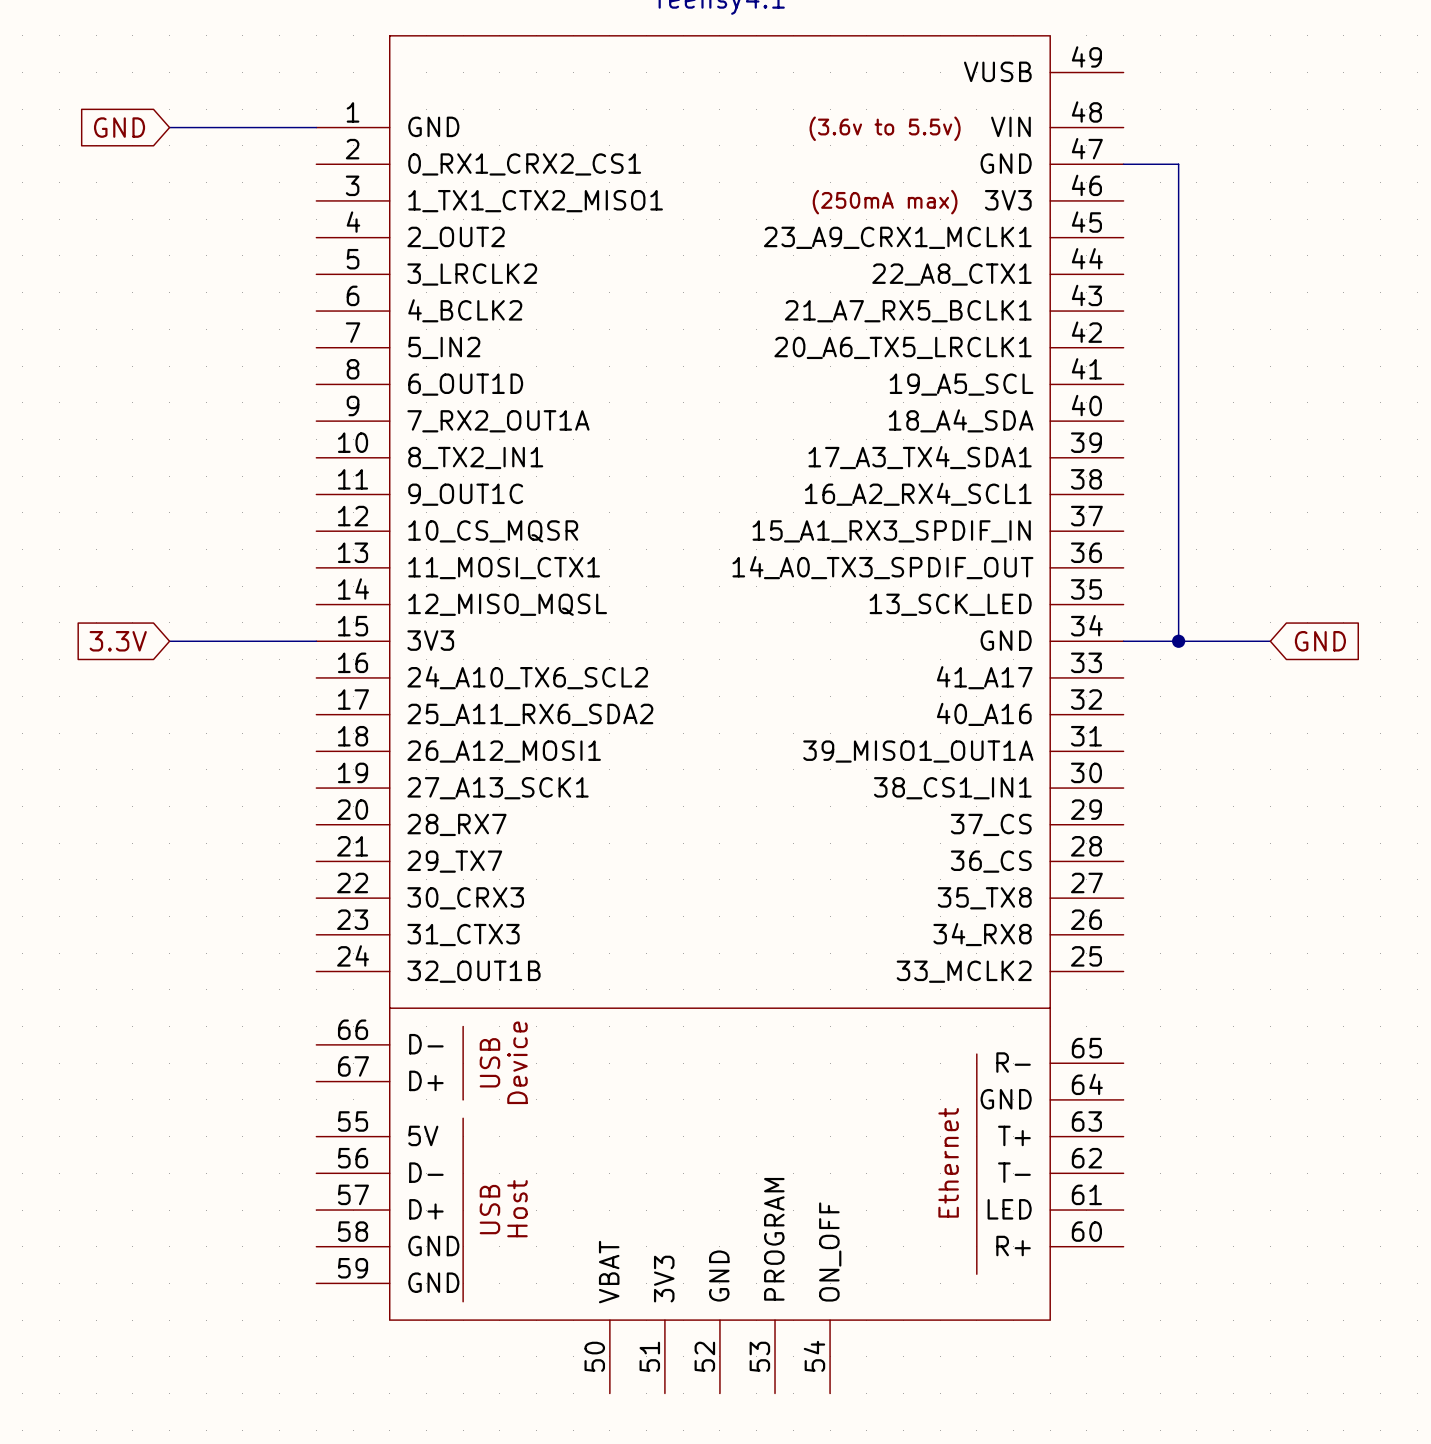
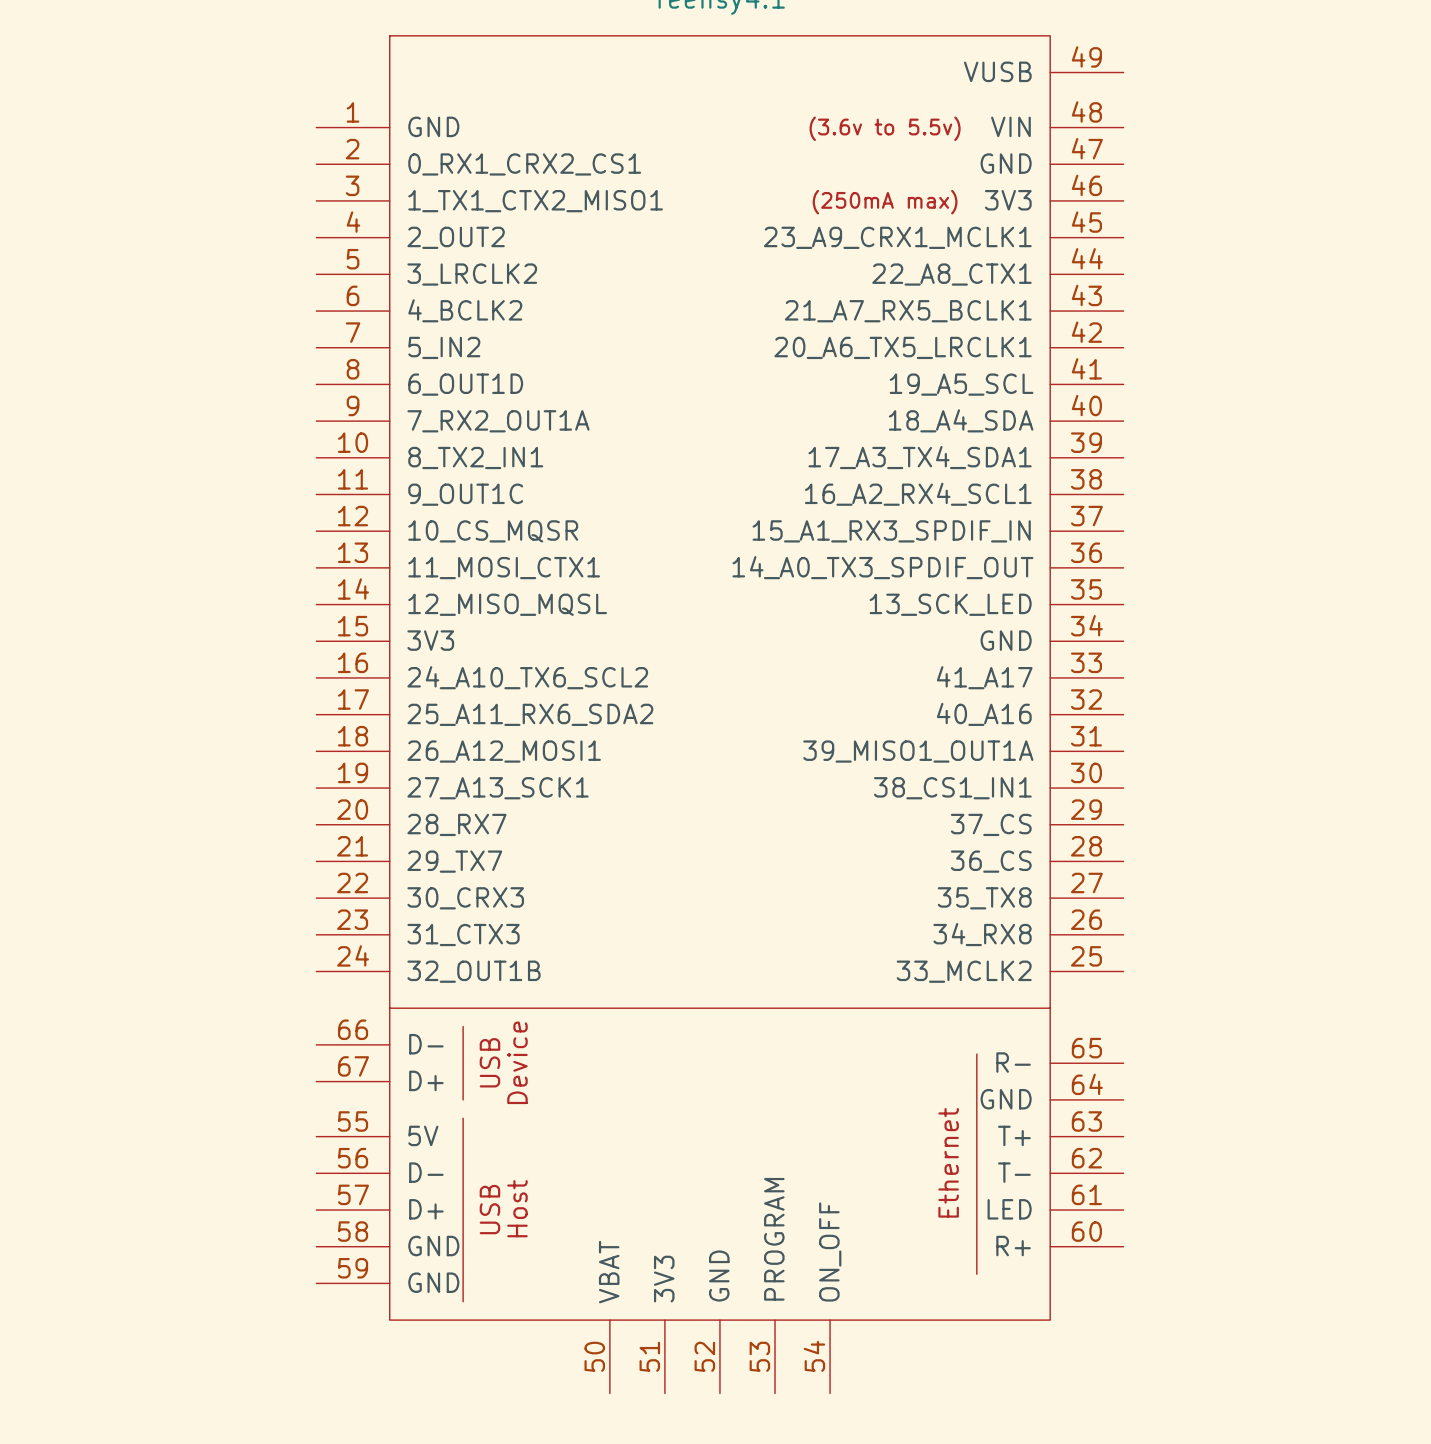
global label: GND (119, 127) -> none
wire: (169, 127) (316, 127) -> none
wire: (1123, 164) (1178, 164) (1178, 641) -> none
global label: 3.3V (118, 641) -> none
wire: (169, 641) (316, 641) -> none
wire: (1123, 641) (1270, 641) -> none
junction: (1178, 641) -> none
global label: GND (1320, 641) -> none

